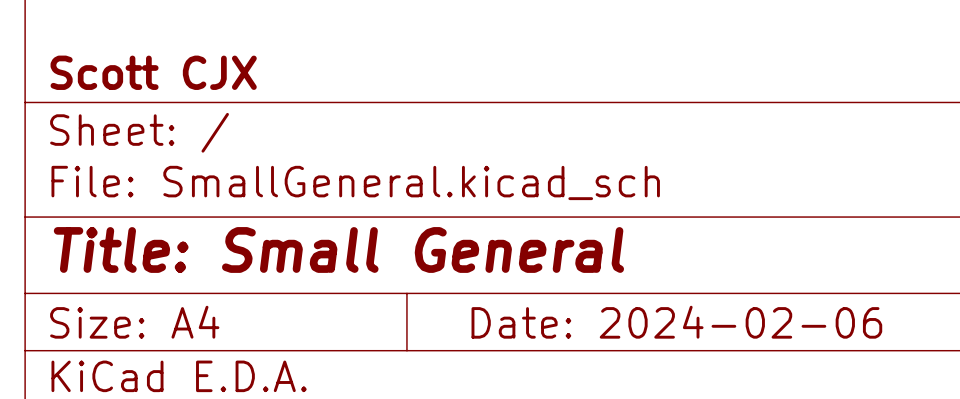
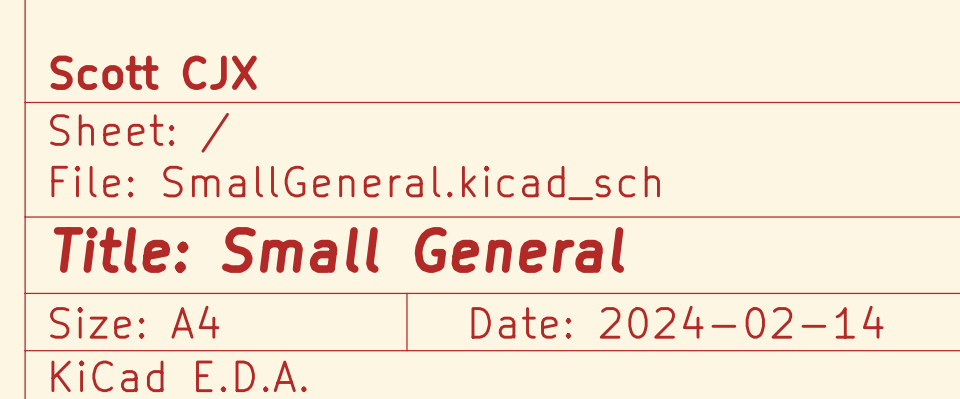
title block: Date: 2024-02-06 (676, 322) -> Date: 2024-02-14 (677, 322)

